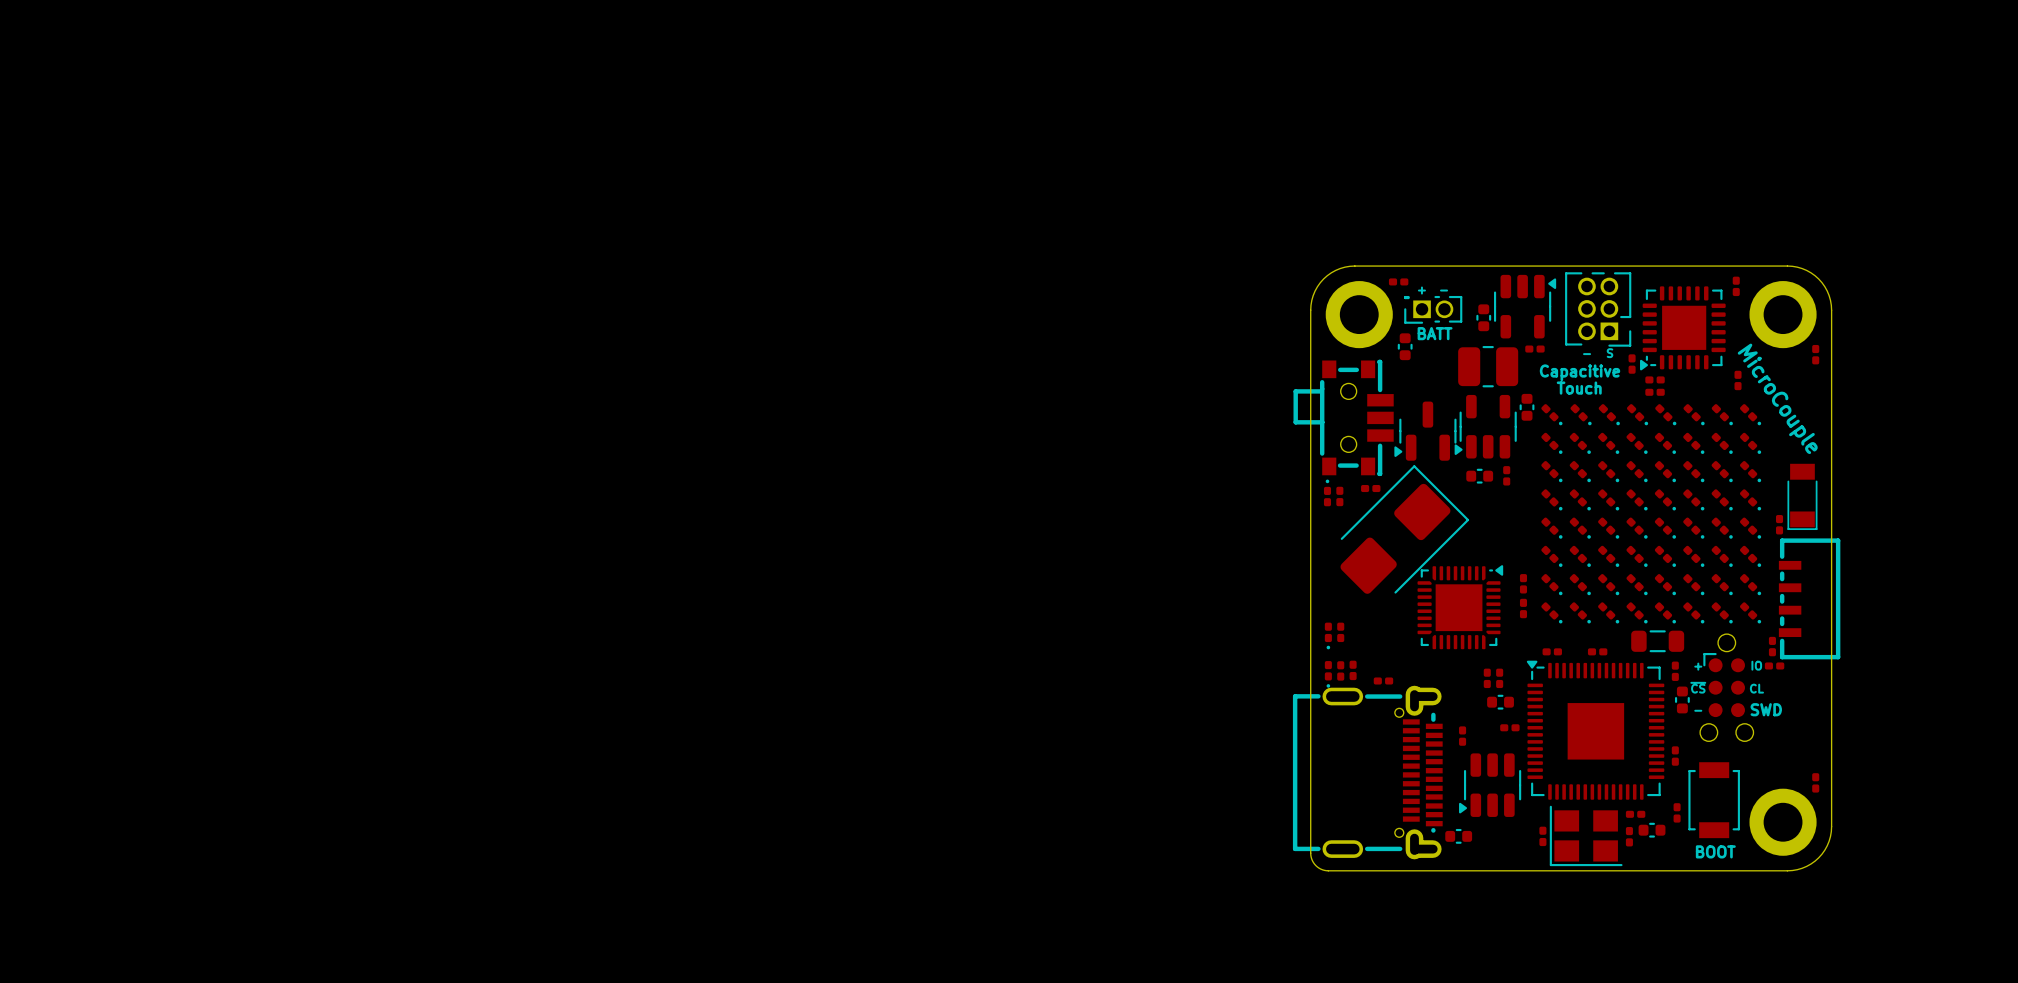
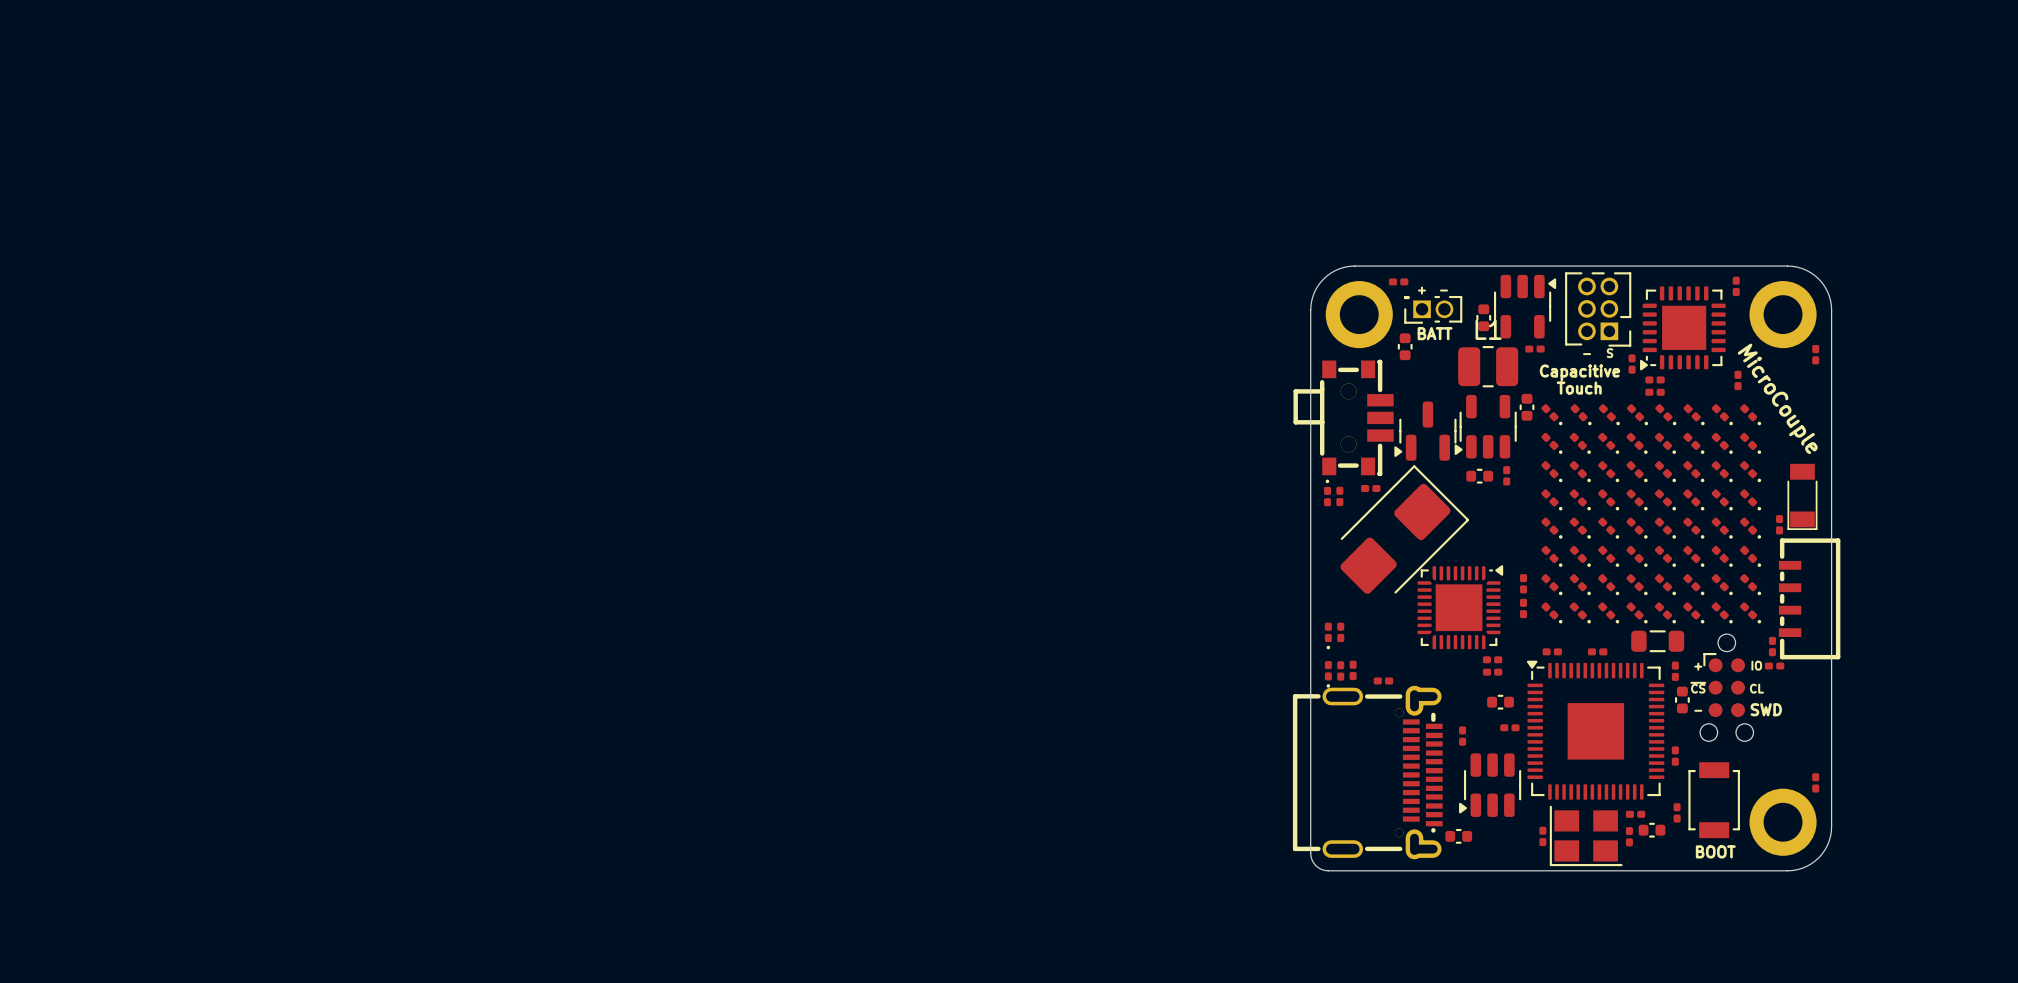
L1 name: none -> L1 (1488, 329)
part footprint: [1293, 359, 1394, 477] -> [1293, 359, 1394, 477]
part: none -> (1492, 659)
part: none -> (1492, 672)
part: (1487, 678) -> none
part: (1499, 678) -> none
part footprint: [1292, 685, 1443, 860] -> [1292, 685, 1443, 860]

